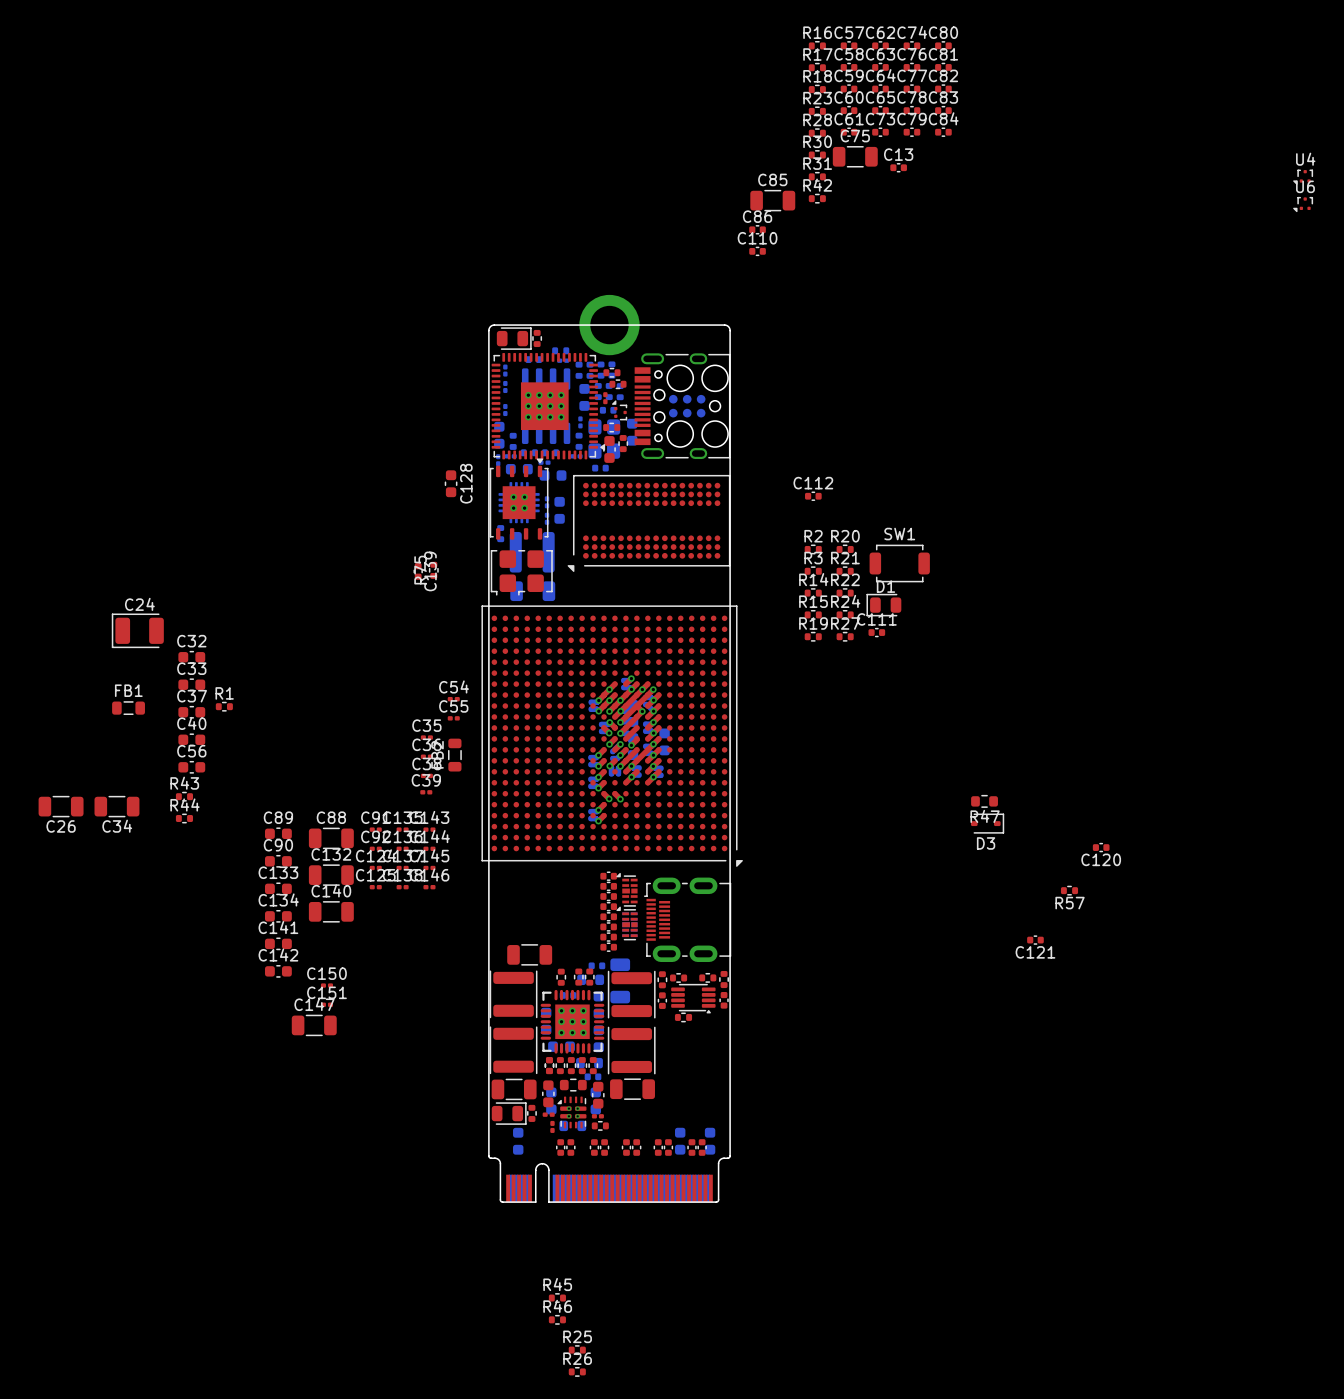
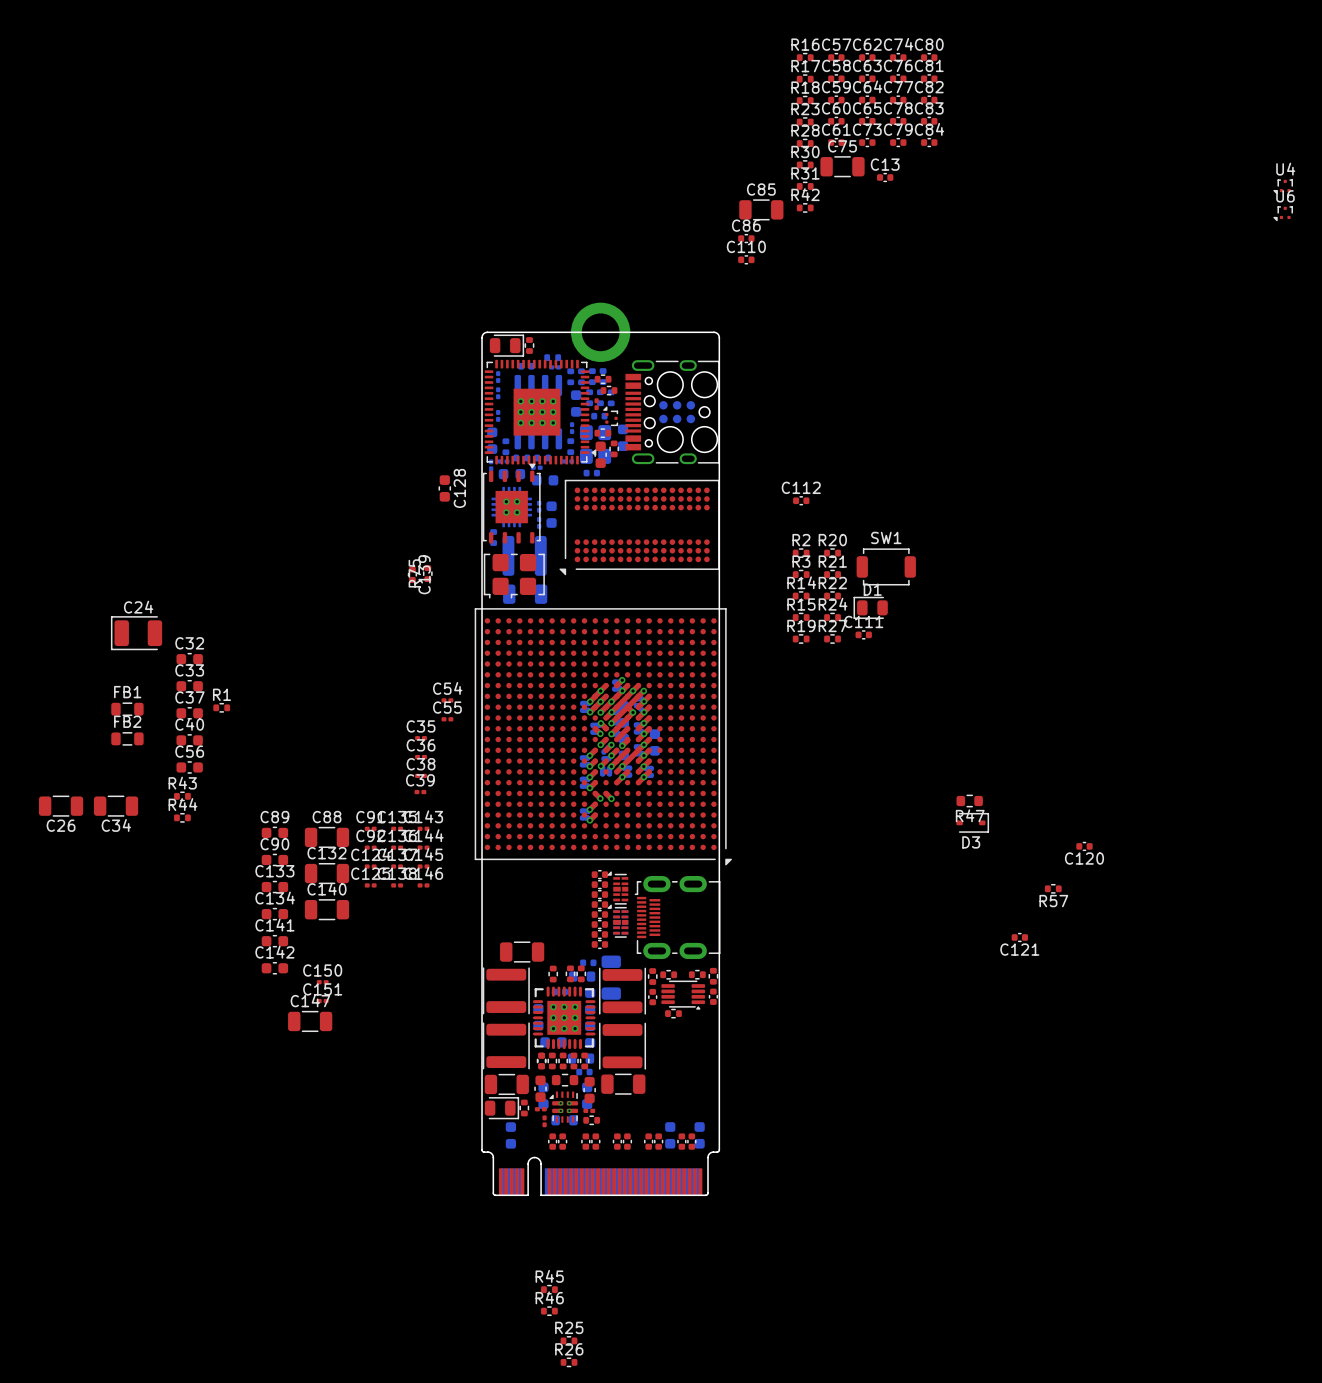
FB2 rotation: 0° (454, 755) -> 90° clockwise (127, 738)
FB2 position: (454, 755) -> (127, 738)

